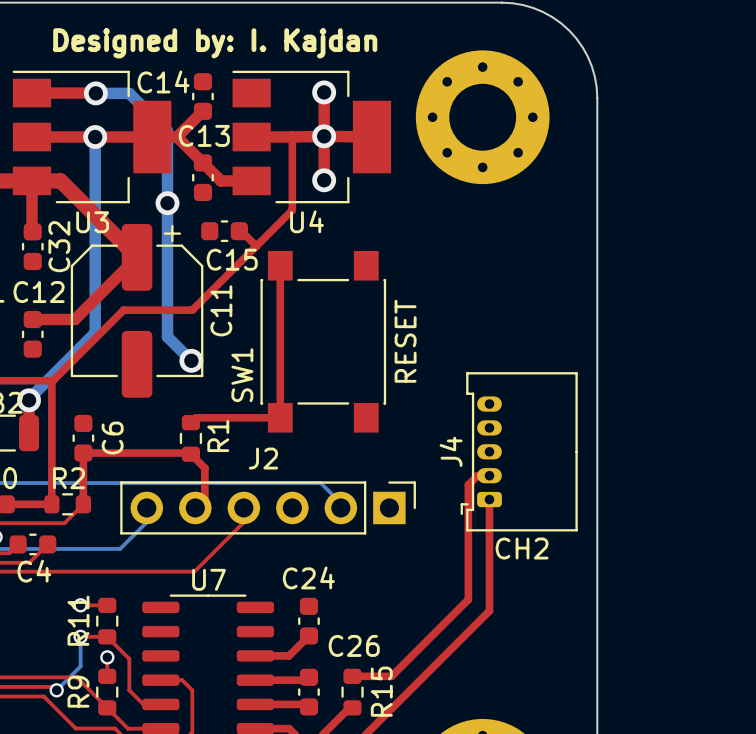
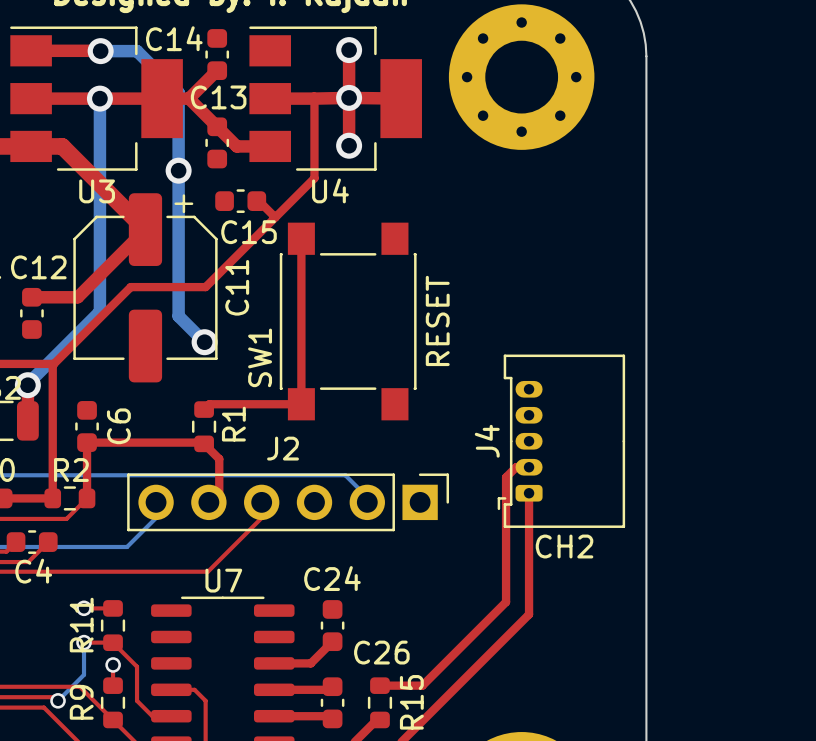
top track: (32, 180) (32, 231) -> none
C32: (32, 246) -> none

